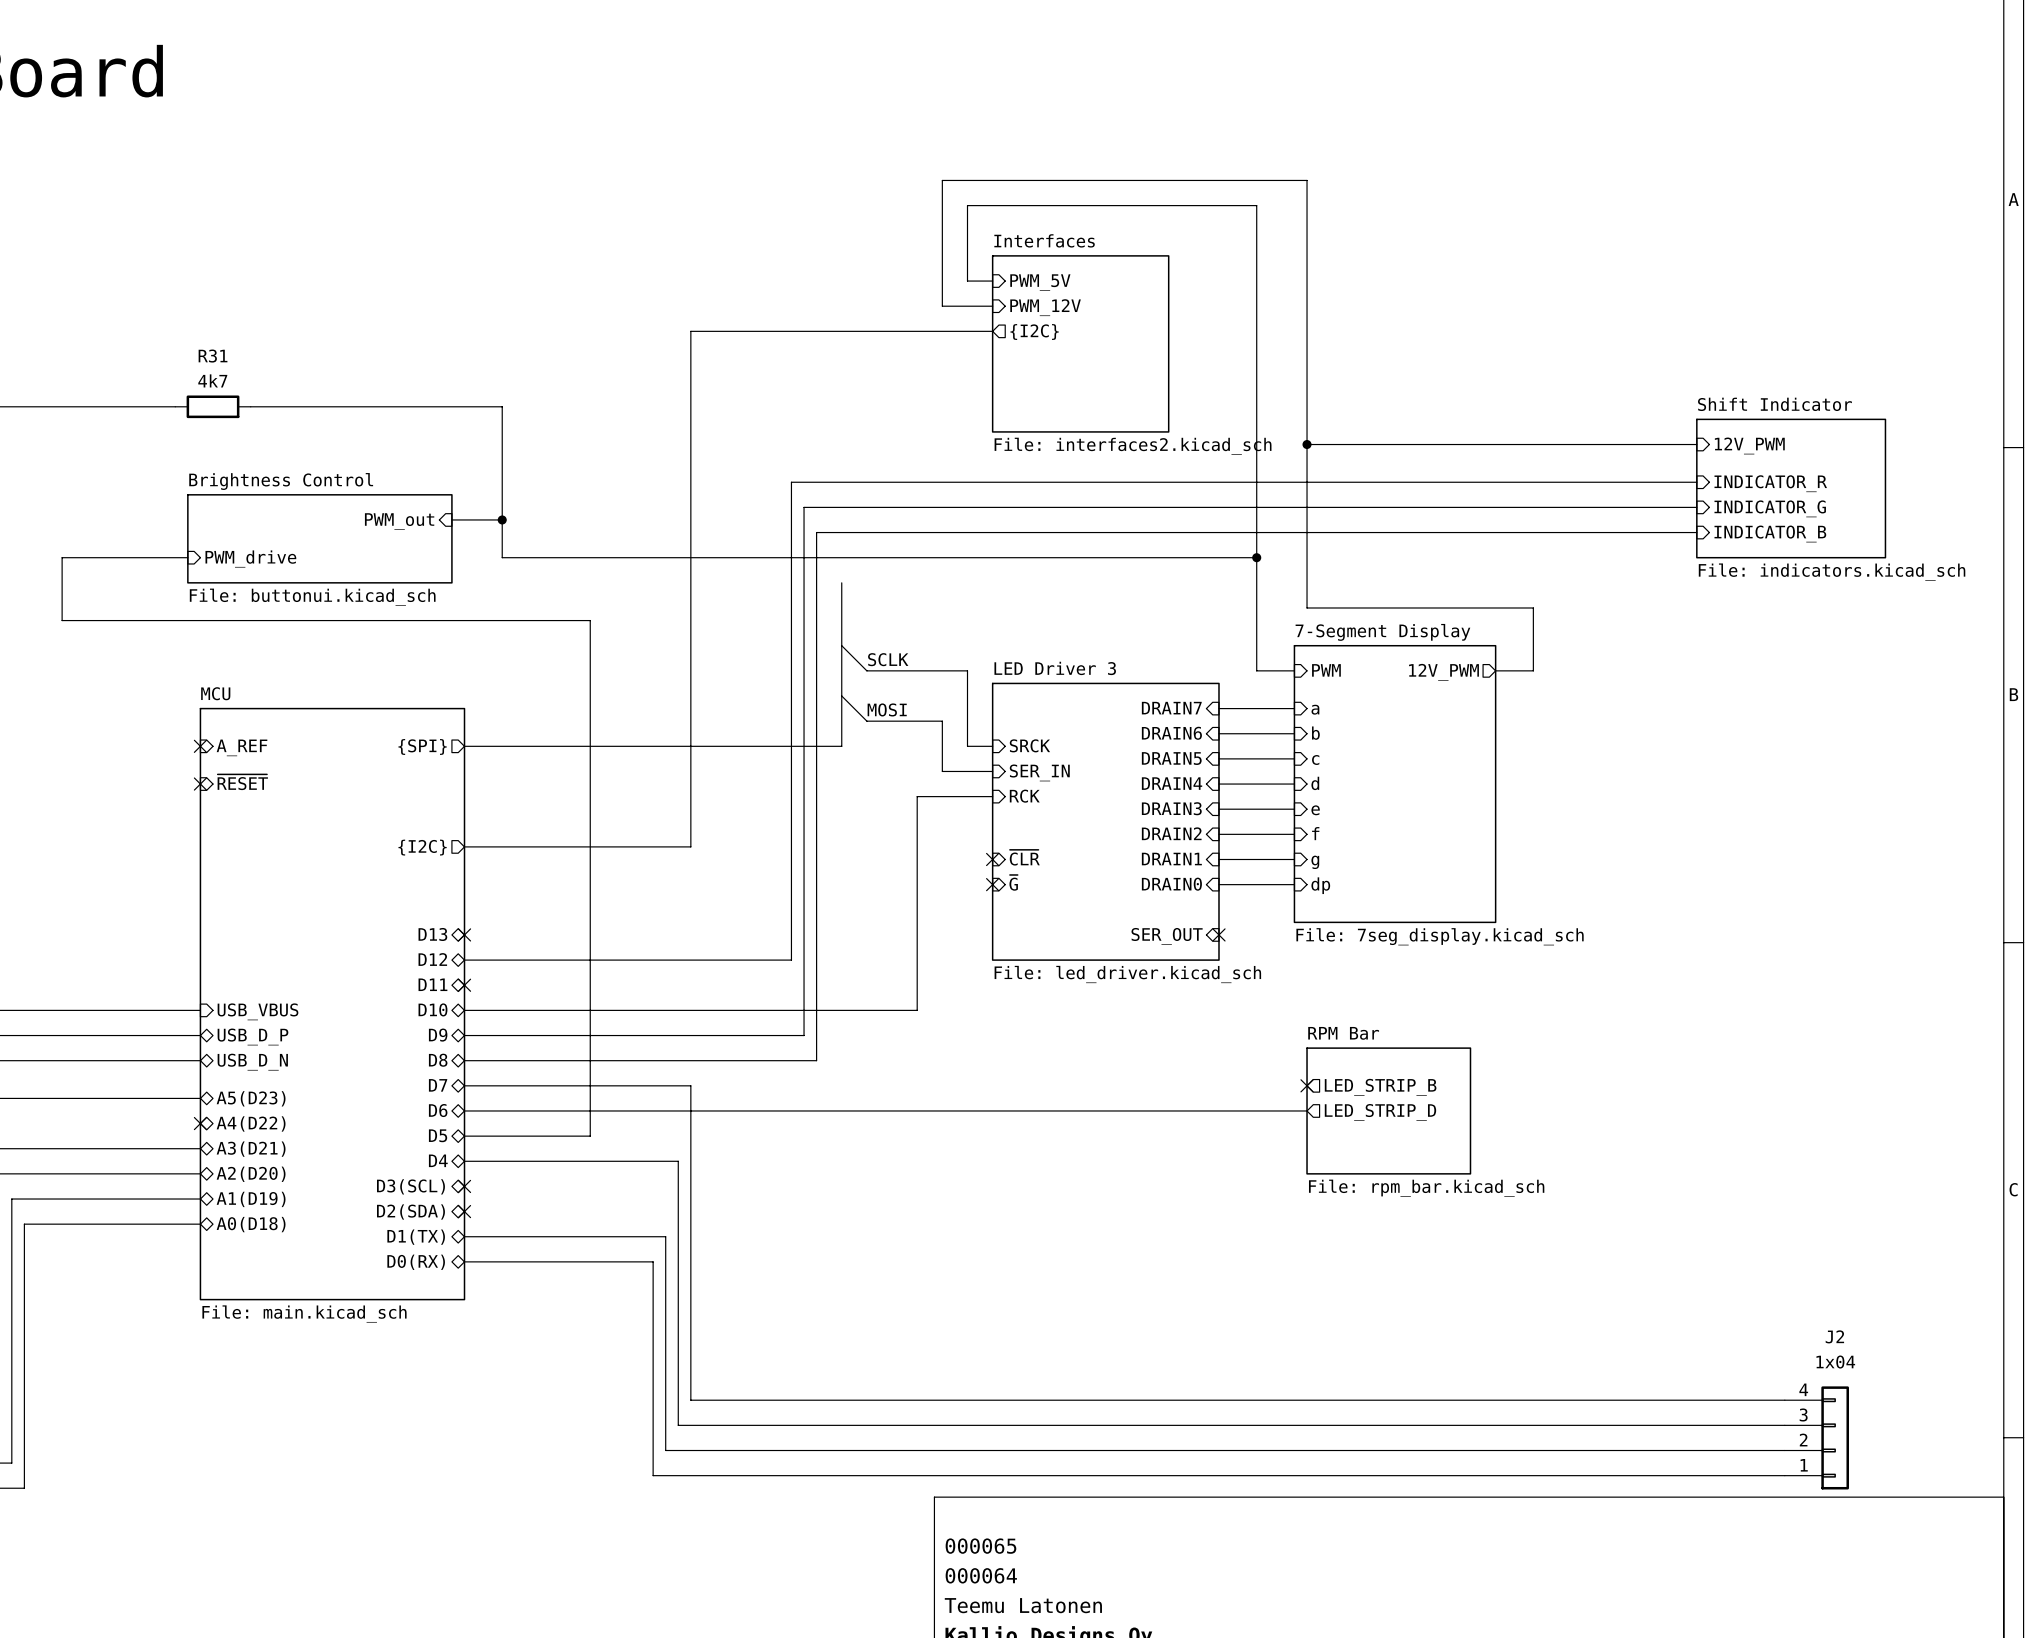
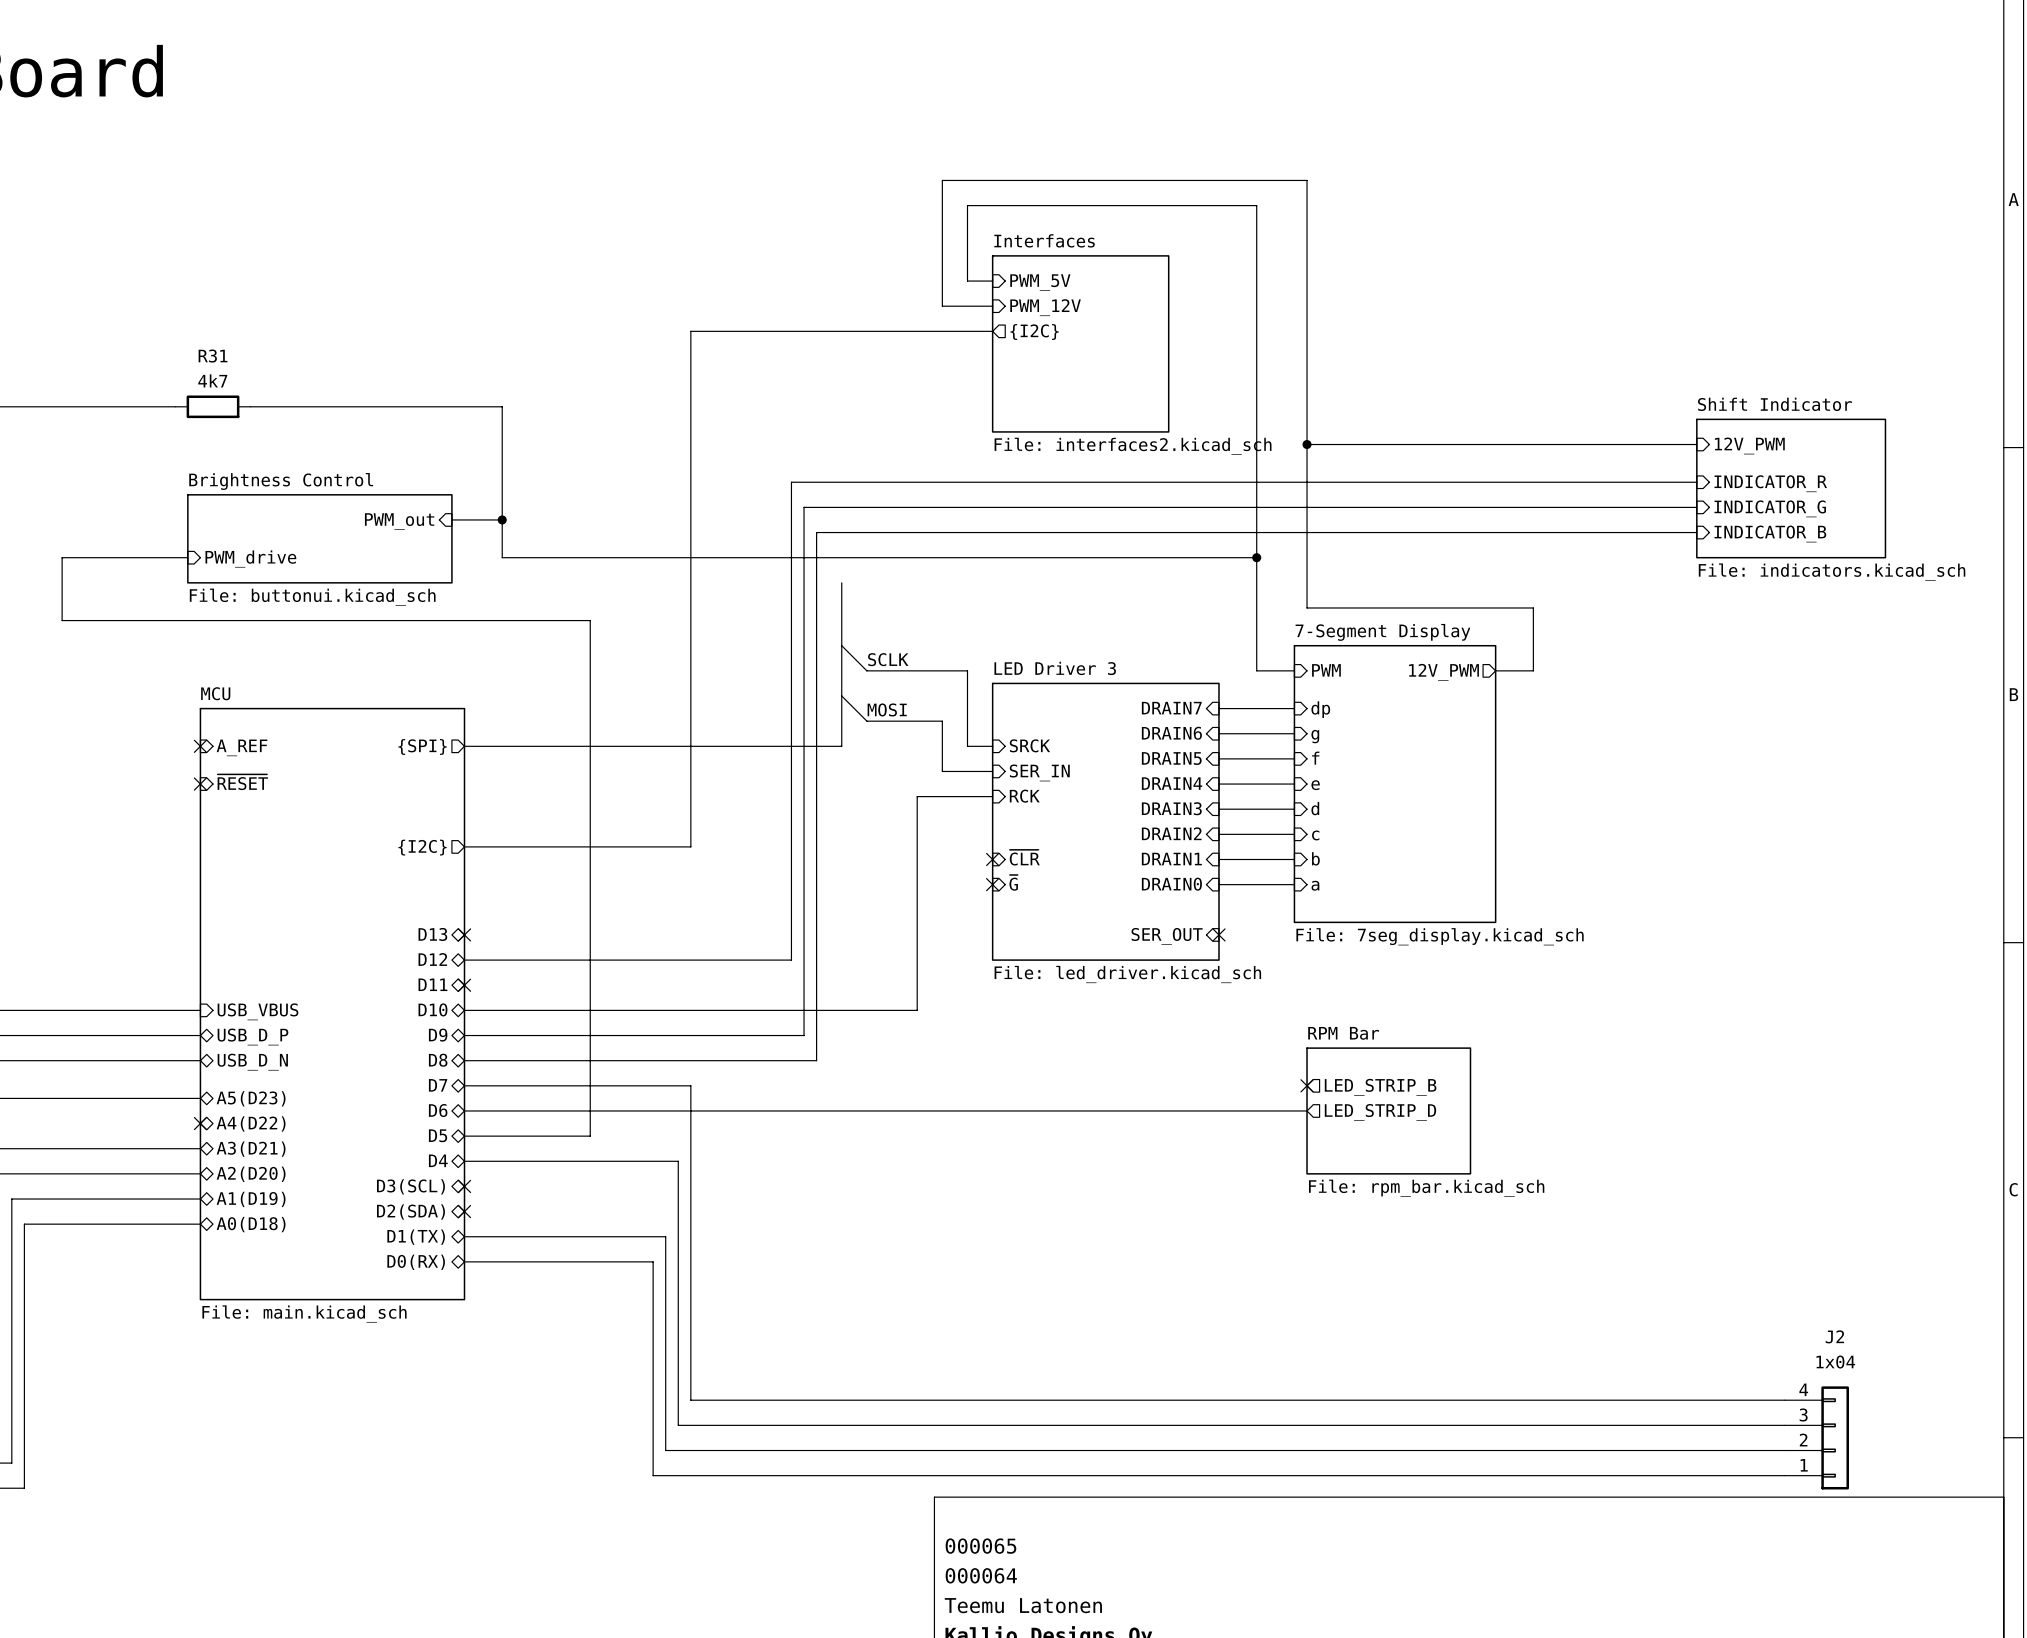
sheet pin: a (1315, 709) -> dp (1320, 709)
sheet pin: b (1315, 733) -> g (1315, 736)
sheet pin: c (1315, 760) -> f (1315, 758)
sheet pin: d (1315, 783) -> e (1315, 785)
sheet pin: e (1315, 810) -> d (1315, 808)
sheet pin: f (1315, 833) -> c (1315, 835)
sheet pin: g (1315, 862) -> b (1315, 858)
sheet pin: dp (1320, 885) -> a (1315, 885)

